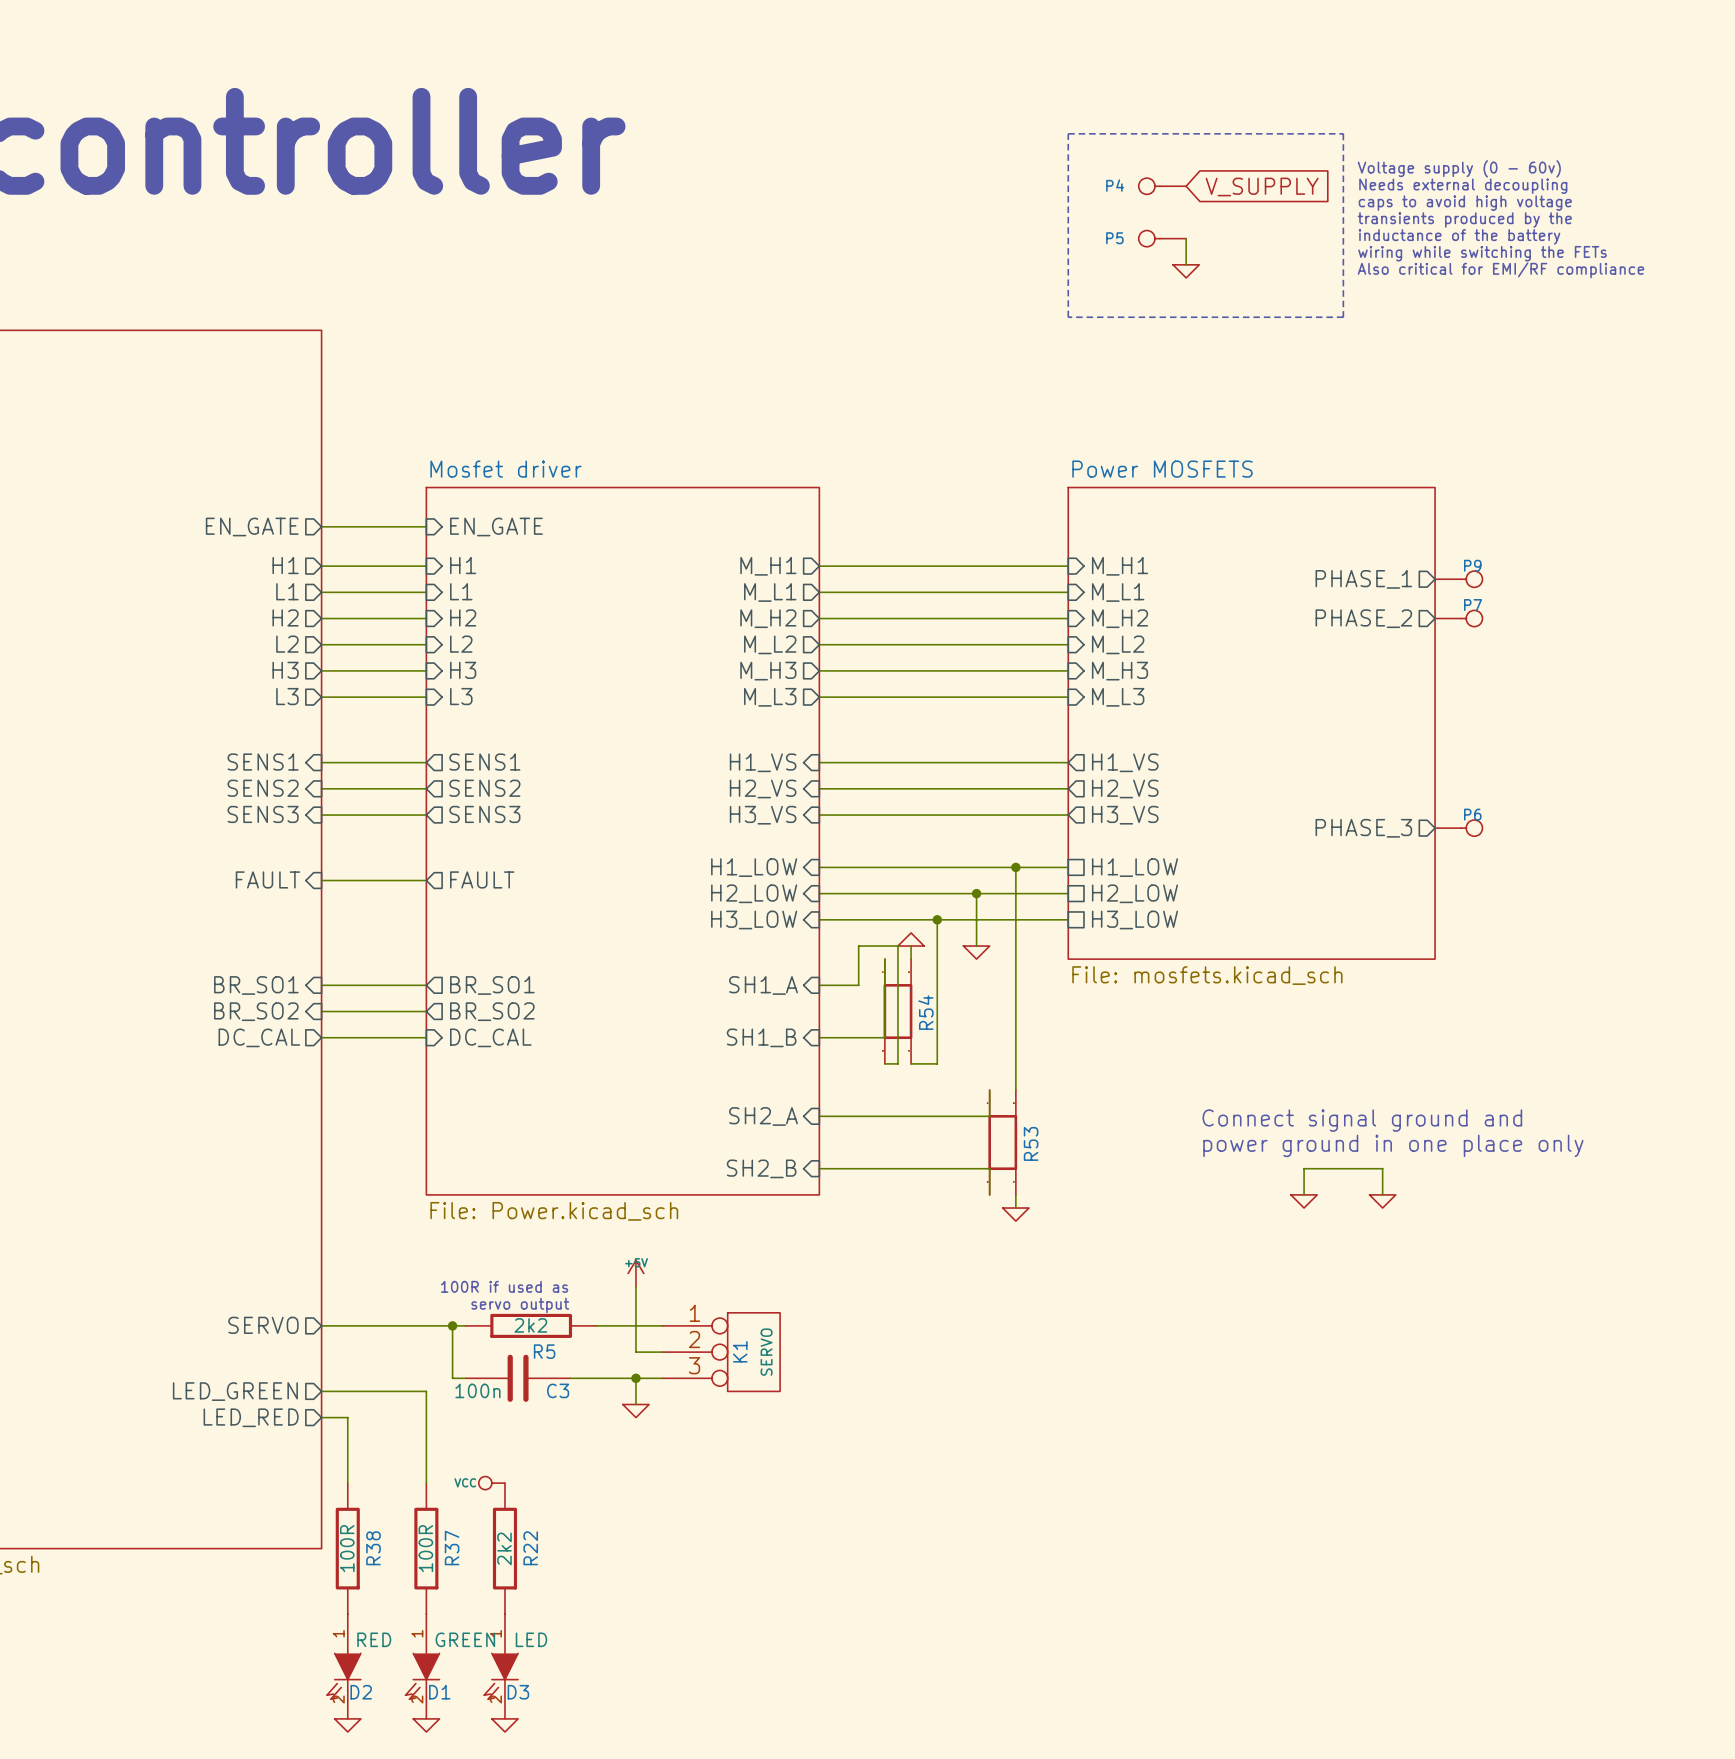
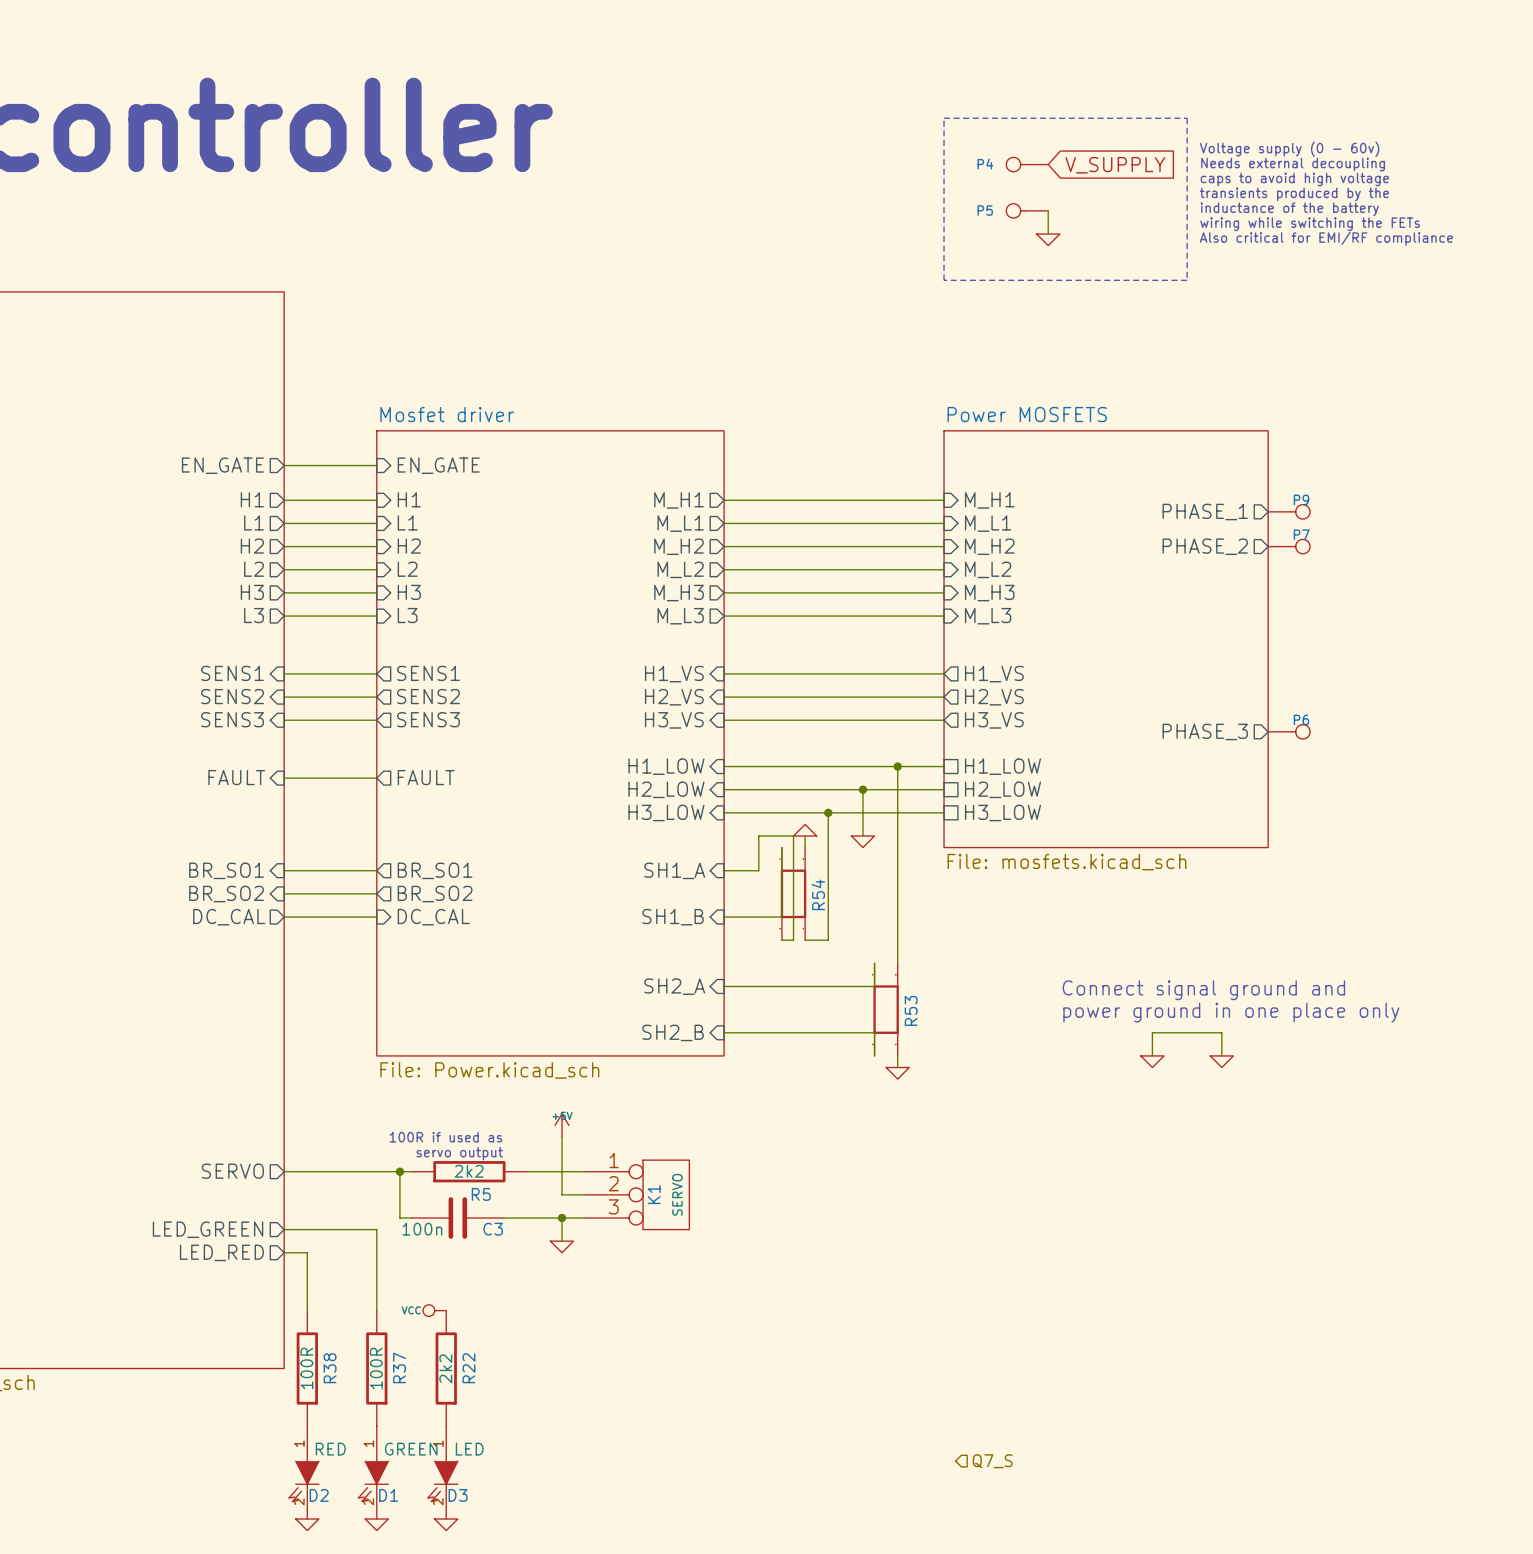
hierarchical label: none -> Q7_S (992, 1461)

